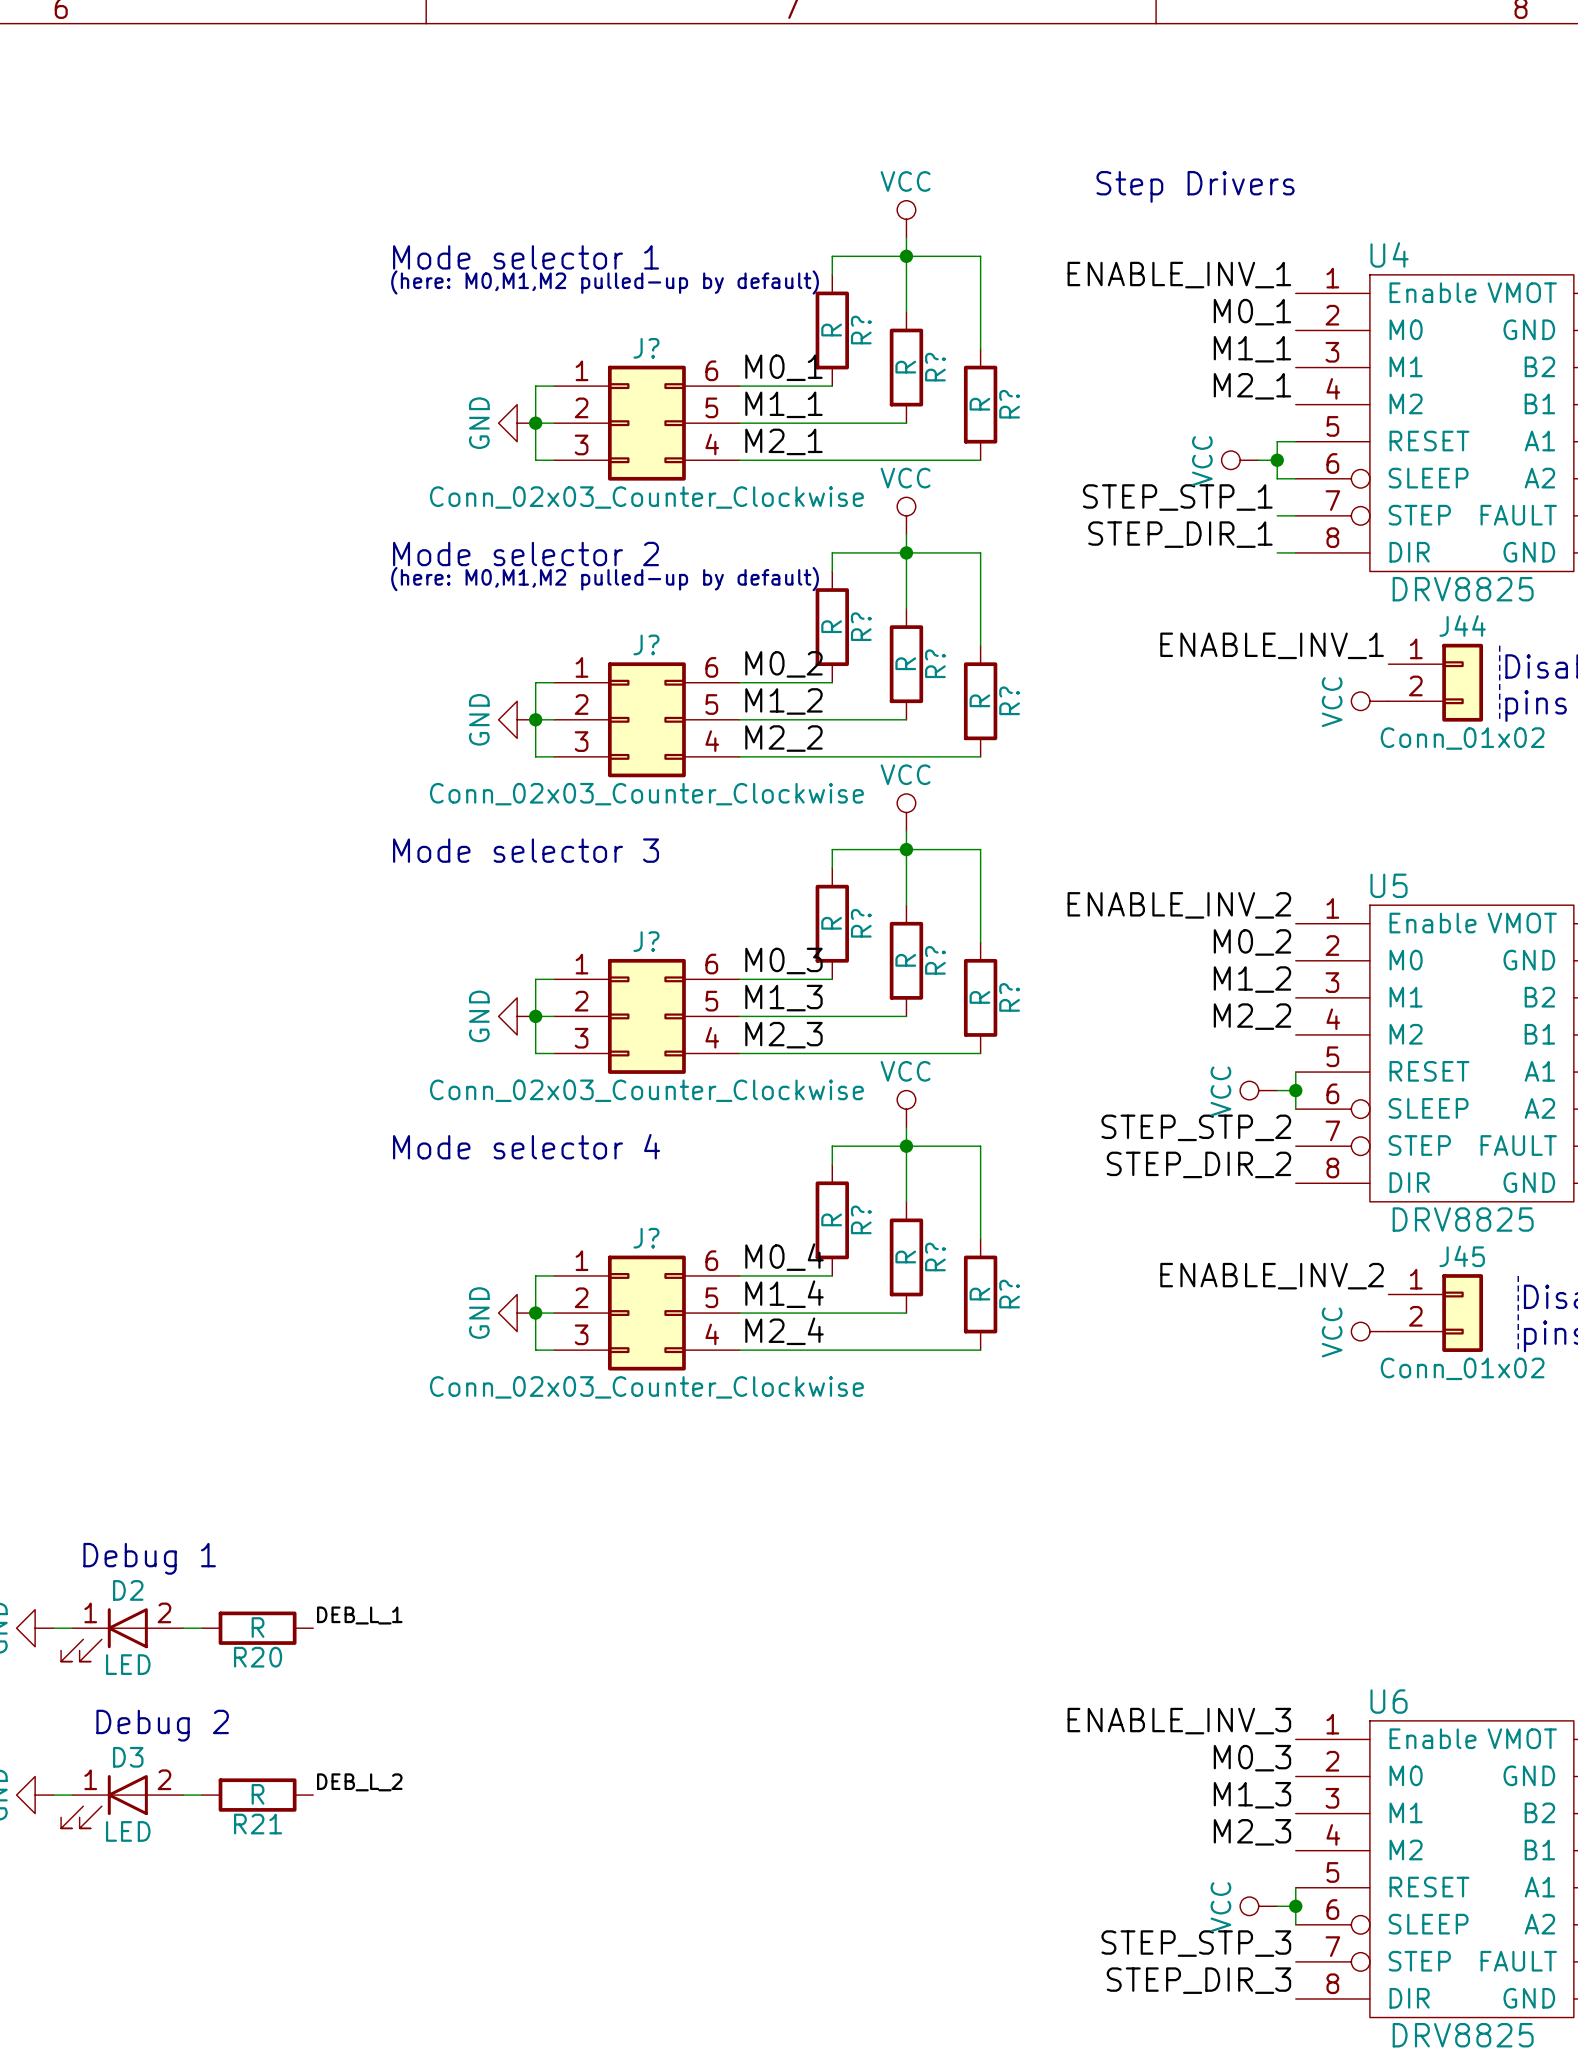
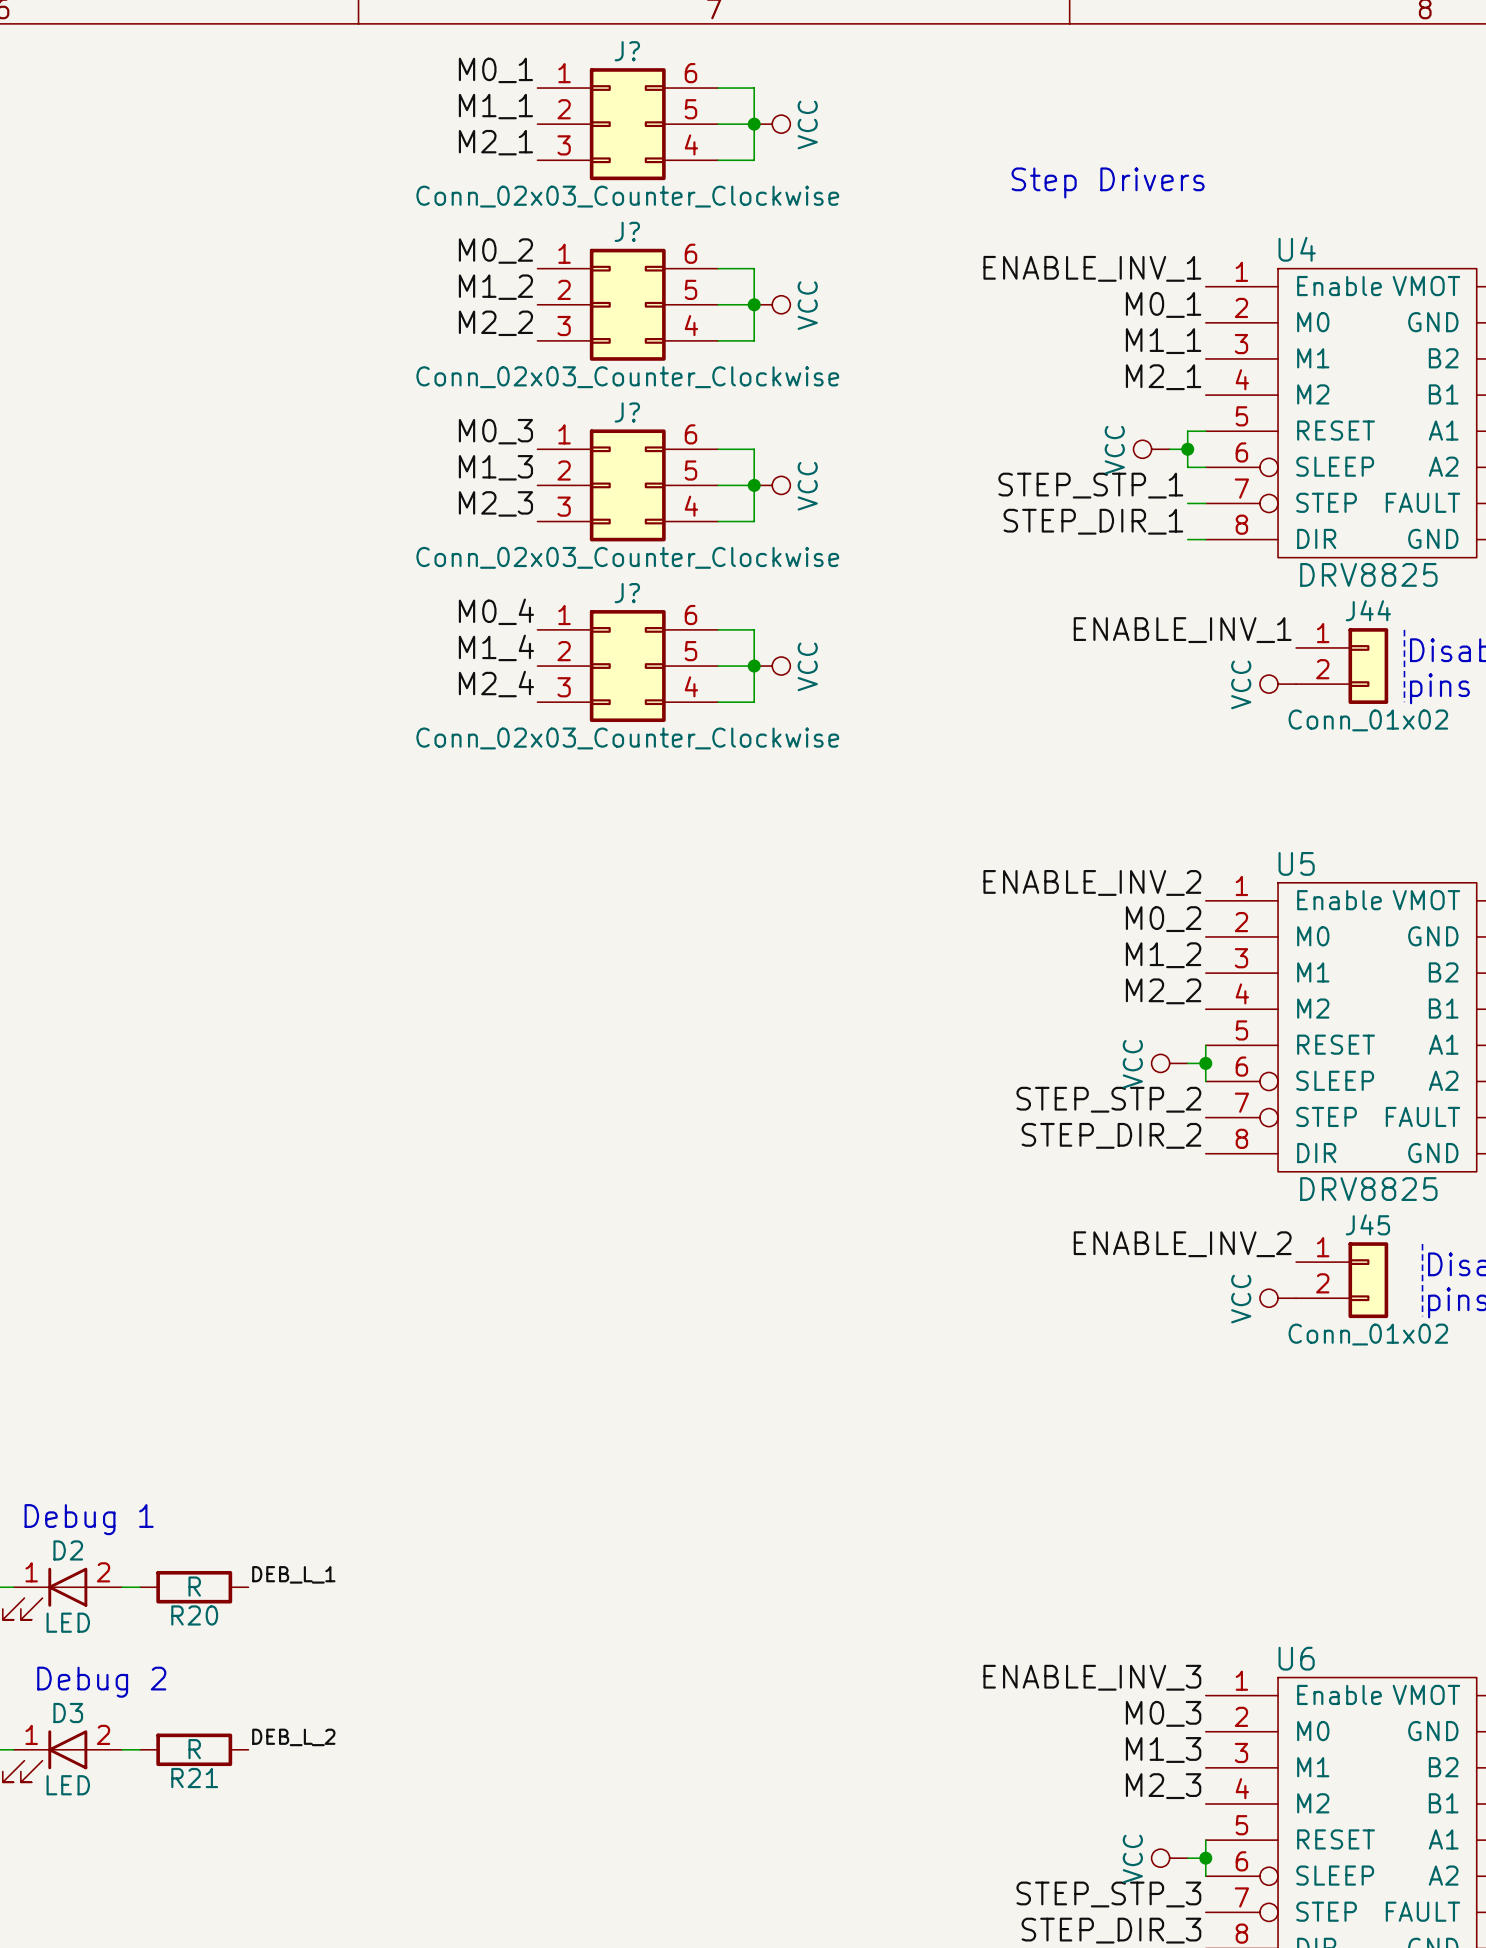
wire: none -> (718, 88) (754, 88) (754, 160) (718, 160)
J?: none -> Conn_02x03_Counter_Clockwise (627, 124)
wire: none -> (718, 124) (754, 124)
junction: none -> (754, 124)
power symbol: none -> VCC (772, 124)
power symbol: VCC (906, 219) -> none
wire: (906, 237) (906, 311) -> none
label: none -> M0_2 (495, 251)
junction: (906, 256) -> none
text: Mode selector 1 (526, 257) -> none
wire: none -> (718, 268) (754, 268) (754, 340) (718, 340)
wire: (832, 274) (832, 256) (980, 256) (980, 349) -> none
text: (here: M0,M1,M2 pulled-up by default) (605, 282) -> none
label: none -> M1_2 (495, 287)
J?: none -> Conn_02x03_Counter_Clockwise (627, 304)
wire: none -> (718, 304) (754, 304)
junction: none -> (754, 304)
power symbol: none -> VCC (772, 304)
label: none -> M2_2 (495, 323)
R?: R (832, 330) -> none
label position: M0_1 (783, 367) -> M0_1 (495, 70)
R?: R (906, 367) -> none
wire: (554, 386) (535, 386) (535, 460) (554, 460) -> none
wire: (739, 386) (832, 386) -> none
label position: M1_1 (783, 404) -> M1_1 (495, 106)
R?: R (980, 404) -> none
power symbol: GND (517, 423) -> none
wire: (535, 423) (554, 423) -> none
junction: (535, 423) -> none
J?: Conn_02x03_Counter_Clockwise (646, 423) -> none
wire: (739, 423) (906, 423) -> none
label position: M2_1 (783, 441) -> M2_1 (495, 142)
label: none -> M0_3 (495, 431)
wire: (832, 460) (980, 460) -> (754, 449) (754, 521) (718, 521)
label: none -> M1_3 (495, 467)
J?: none -> Conn_02x03_Counter_Clockwise (627, 485)
wire: none -> (718, 485) (754, 485)
junction: none -> (754, 485)
power symbol rotation: 0° (906, 515) -> 90° clockwise (772, 485)
power symbol position: VCC (906, 515) -> VCC (772, 485)
label: none -> M2_3 (495, 503)
wire: (906, 534) (906, 608) -> none
junction: (906, 552) -> none
text: Mode selector 2 (526, 553) -> none
wire: (832, 571) (832, 552) (980, 552) (980, 645) -> none
text: (here: M0,M1,M2 pulled-up by default) (605, 579) -> none
label: none -> M0_4 (496, 611)
R?: R (832, 627) -> none
label: none -> M1_4 (496, 647)
label: M0_2 (783, 664) -> none
R?: R (906, 664) -> none
wire: (554, 682) (535, 682) (535, 756) (554, 756) -> none
junction: none -> (754, 666)
power symbol: none -> VCC (772, 666)
label: none -> M2_4 (496, 684)
label: M1_2 (783, 701) -> none
R?: R (980, 701) -> none
power symbol: GND (517, 719) -> none
wire: (535, 719) (554, 719) -> none
junction: (535, 719) -> none
J? position: (646, 719) -> (627, 666)
wire: (832, 719) (906, 719) -> (754, 702) (754, 629) (718, 629)
label: M2_2 (783, 738) -> none
wire: (739, 756) (980, 756) -> none
power symbol: VCC (906, 812) -> none
wire: (906, 831) (906, 905) -> none
junction: (906, 849) -> none
text: Mode selector 3 (526, 850) -> none
wire: (832, 868) (832, 849) (980, 849) (980, 942) -> none
R?: R (832, 923) -> none
label: M0_3 (783, 960) -> none
R?: R (906, 960) -> none
wire: (554, 979) (535, 979) (535, 1053) (554, 1053) -> none
wire: (739, 979) (832, 979) -> none
R?: R (980, 997) -> none
label: M1_3 (783, 998) -> none
power symbol: GND (517, 1016) -> none
wire: (535, 1016) (554, 1016) -> none
junction: (535, 1016) -> none
J?: Conn_02x03_Counter_Clockwise (646, 1016) -> none
wire: (739, 1016) (906, 1016) -> none
label: M2_3 (783, 1035) -> none
wire: (739, 1053) (980, 1053) -> none
power symbol: VCC (906, 1109) -> none
wire: (906, 1127) (906, 1201) -> none
text: Mode selector 4 (526, 1146) -> none
junction: (906, 1146) -> none
wire: (832, 1164) (832, 1146) (980, 1146) (980, 1238) -> none
R?: R (832, 1220) -> none
label: M0_4 (784, 1257) -> none
R?: R (906, 1257) -> none
wire: (554, 1275) (535, 1275) (535, 1350) (554, 1350) -> none
wire: (739, 1275) (832, 1275) -> none
label: M1_4 (784, 1294) -> none
R?: R (980, 1294) -> none
power symbol: GND (517, 1313) -> none
wire: (535, 1313) (554, 1313) -> none
junction: (535, 1313) -> none
J?: Conn_02x03_Counter_Clockwise (646, 1313) -> none
wire: (739, 1313) (906, 1313) -> none
label: M2_4 (784, 1331) -> none
wire: (739, 1350) (980, 1350) -> none

